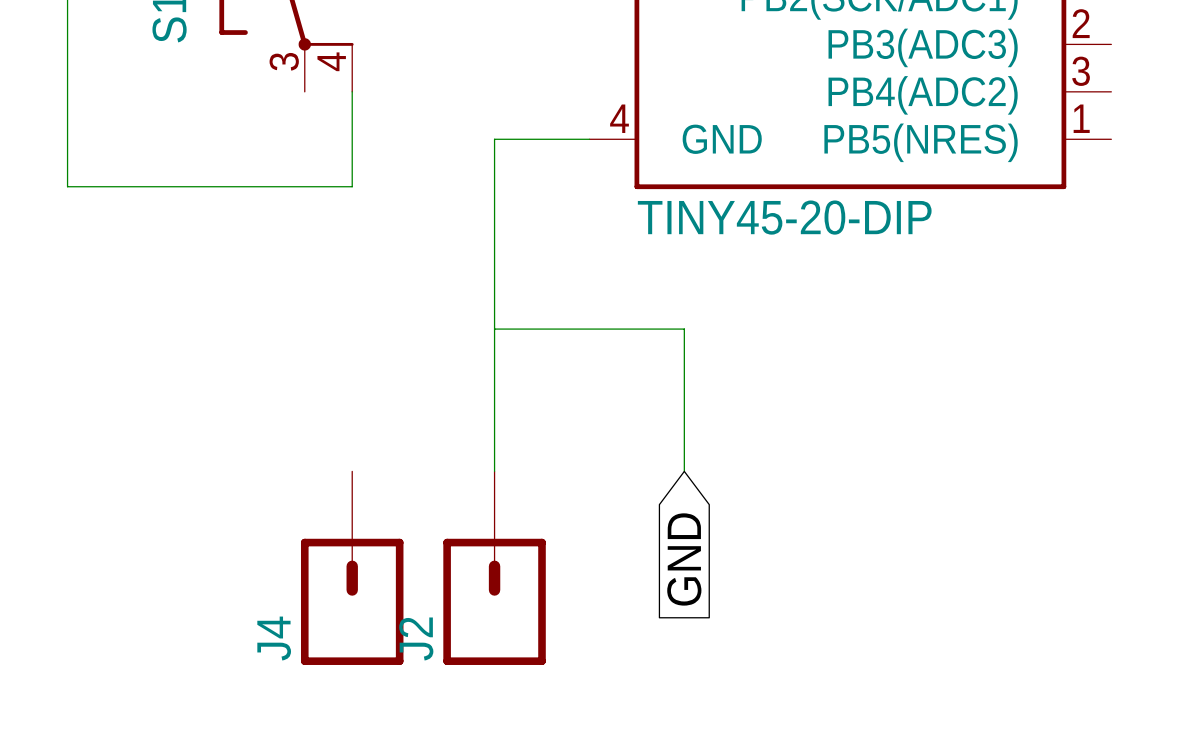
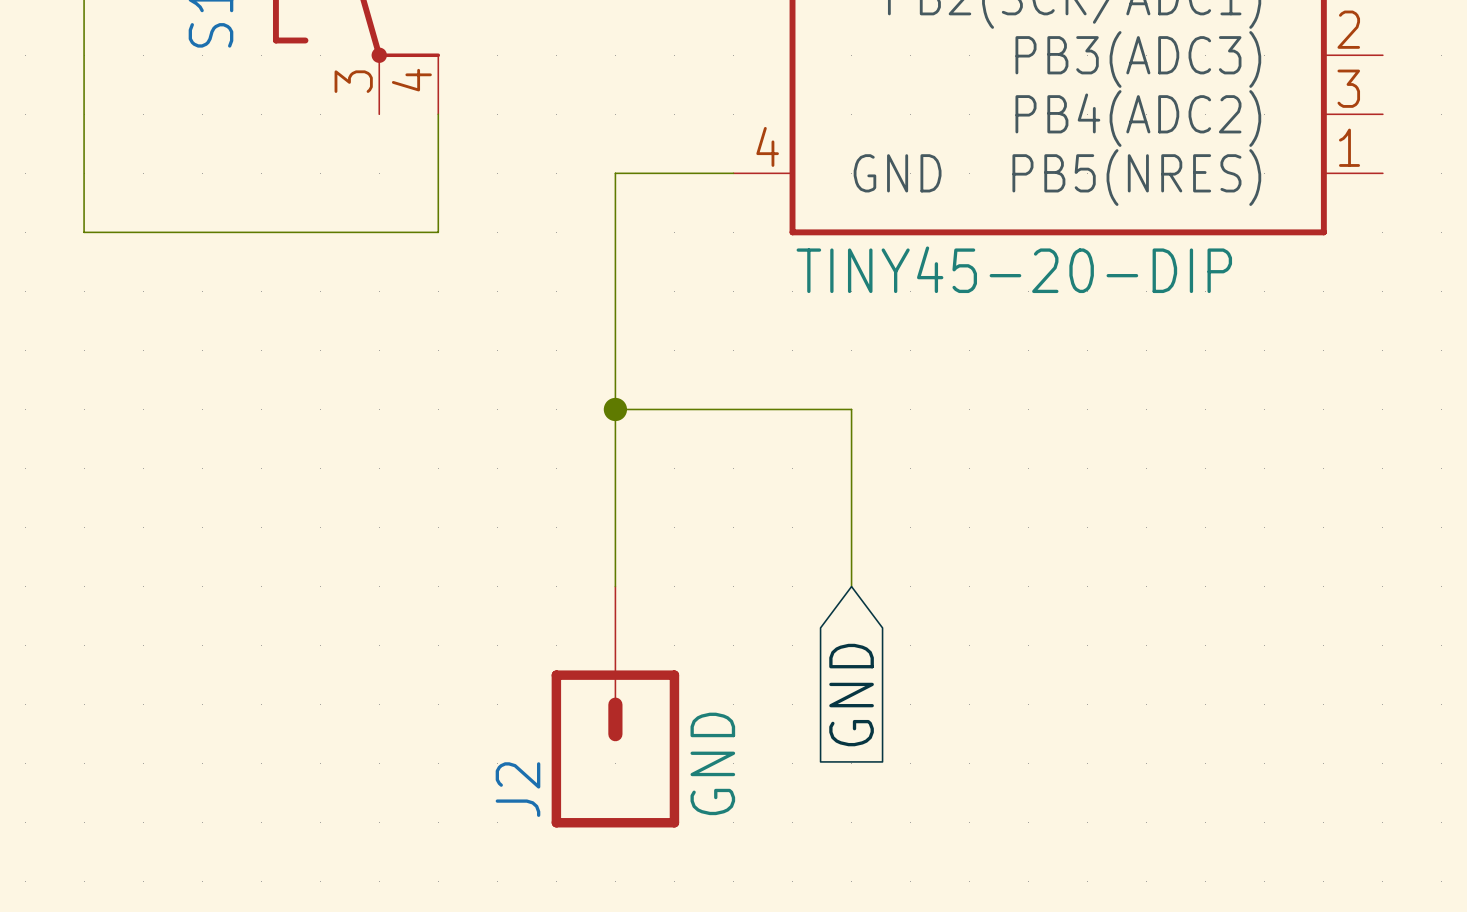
junction: none -> (615, 409)
J4: (352, 568) -> none
J2 value: none -> GND (712, 763)

